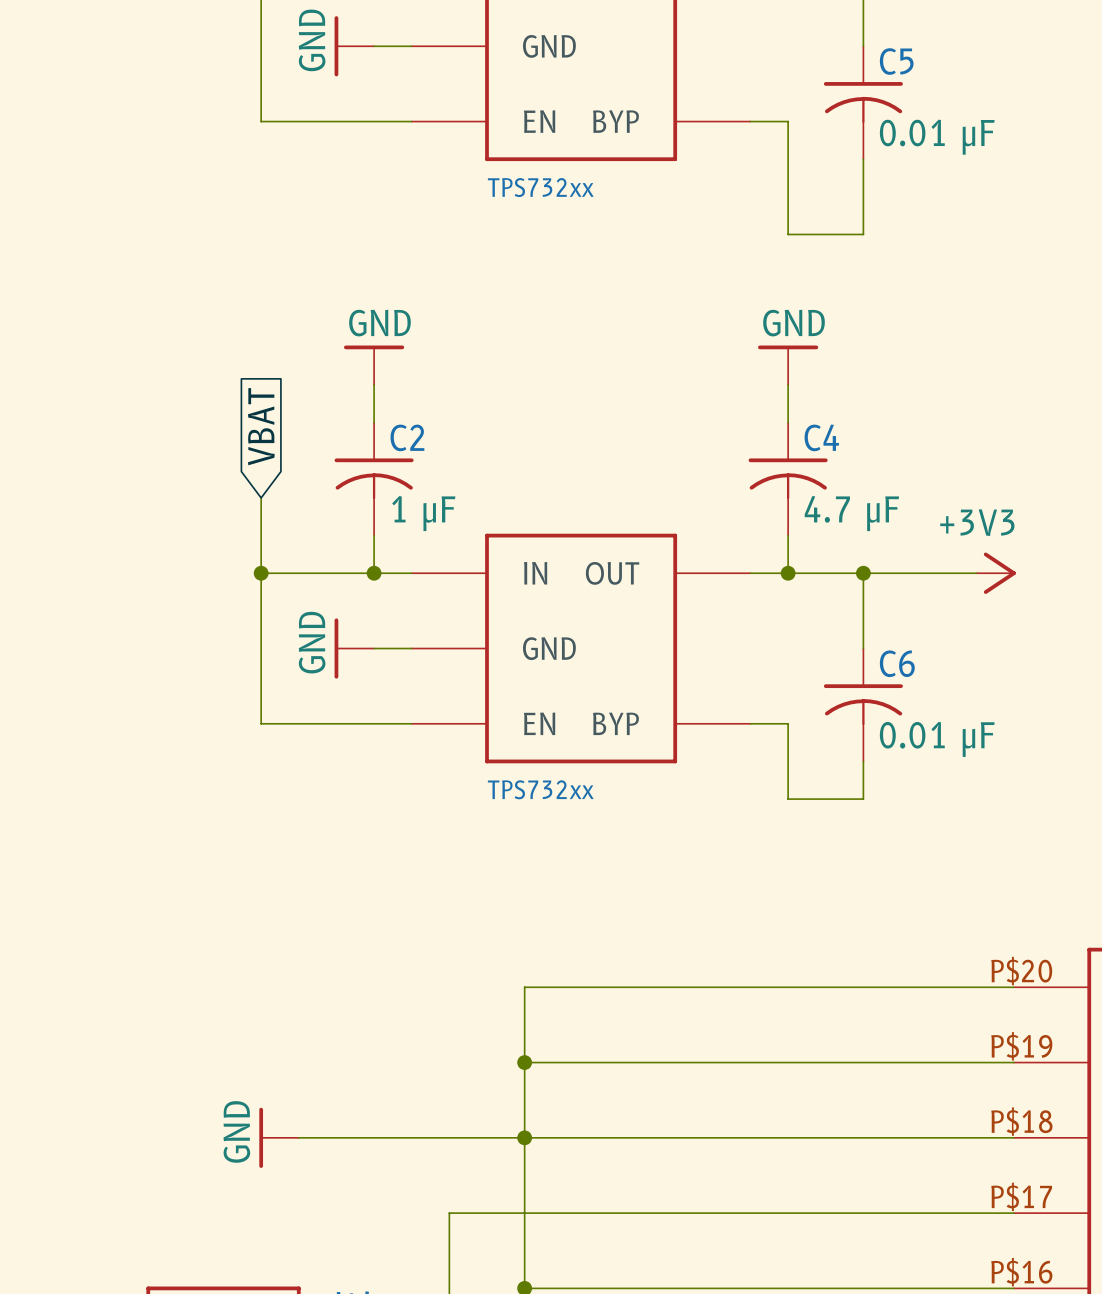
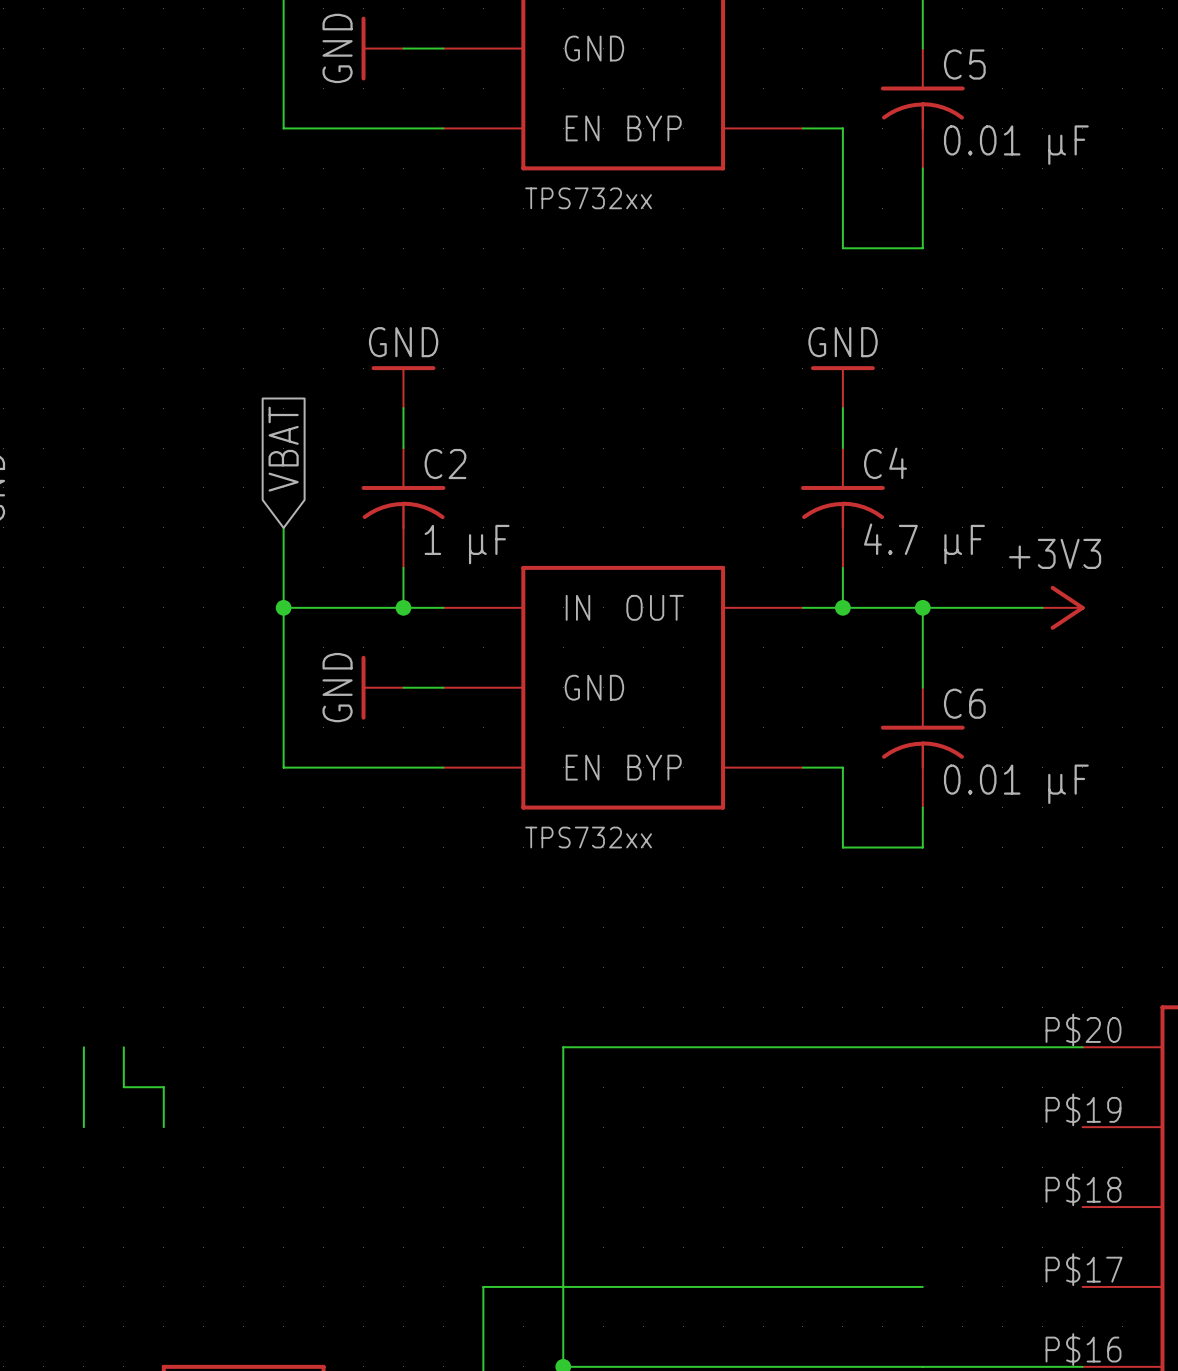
wire: none -> (83, 1047) (83, 1127)
wire: none -> (123, 1047) (123, 1087) (163, 1087) (163, 1127)
wire: (524, 1062) (1013, 1062) -> none
junction: (524, 1062) -> none
power symbol: GND (279, 1137) -> none
wire: (298, 1137) (1013, 1137) -> none
junction: (524, 1137) -> none
wire: (863, 1213) (1013, 1213) -> none

